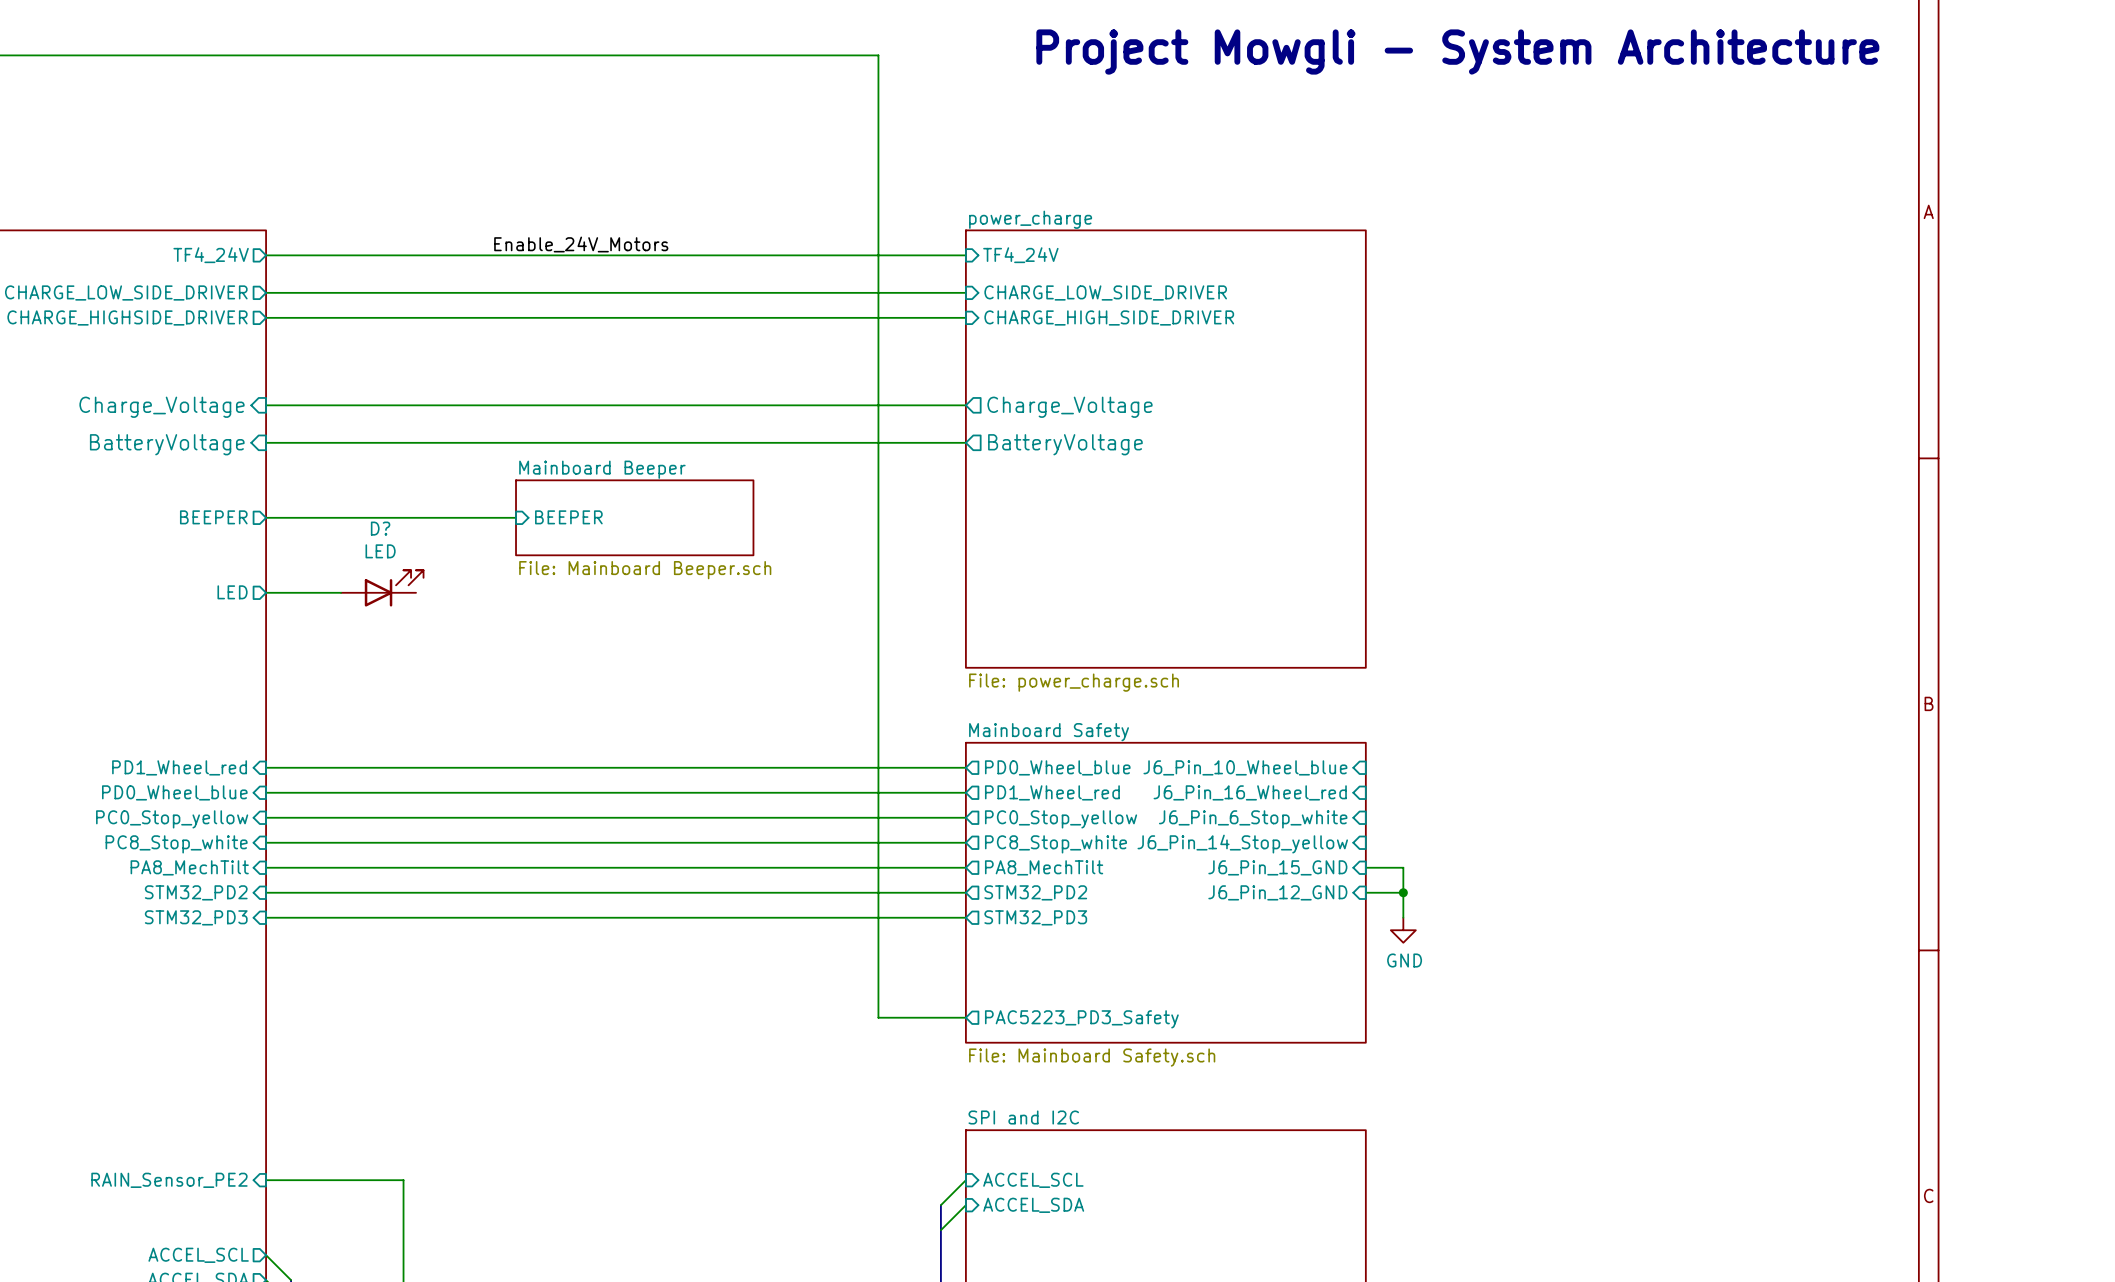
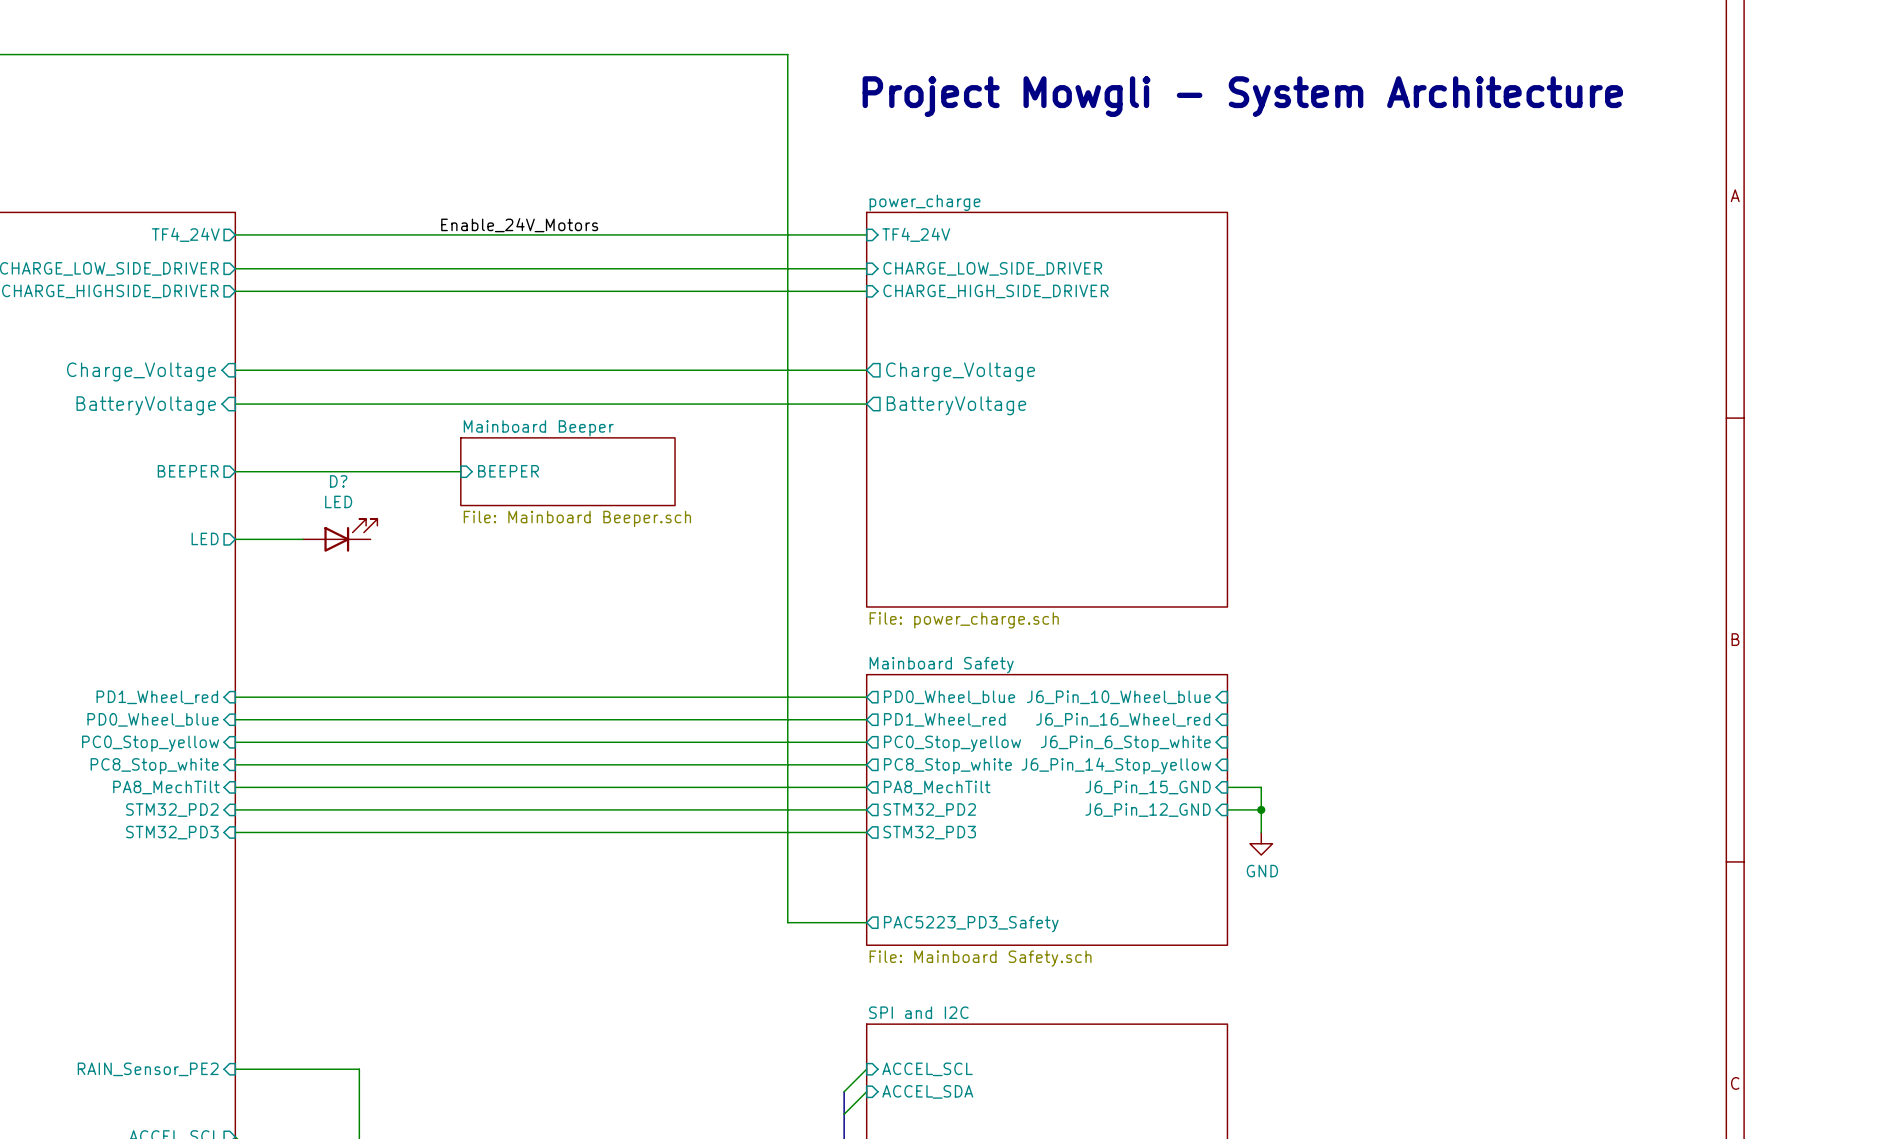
text position: Project Mowgli - System Architecture (1457, 52) -> Project Mowgli - System Architecture (1242, 96)

